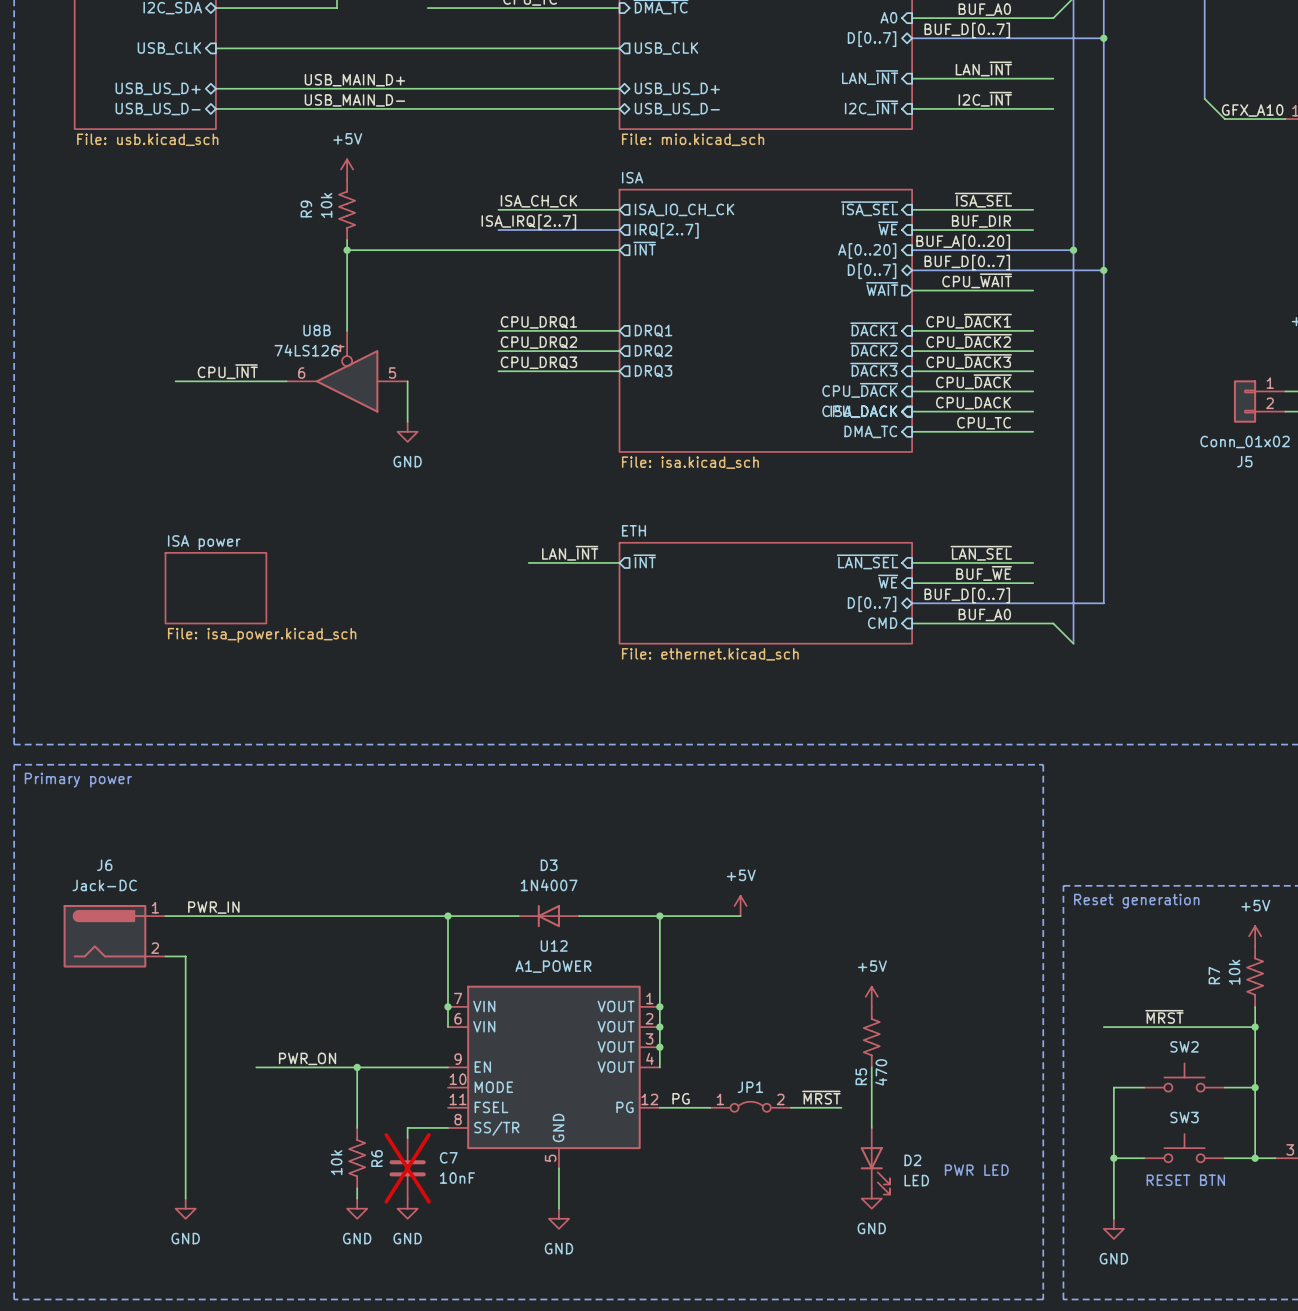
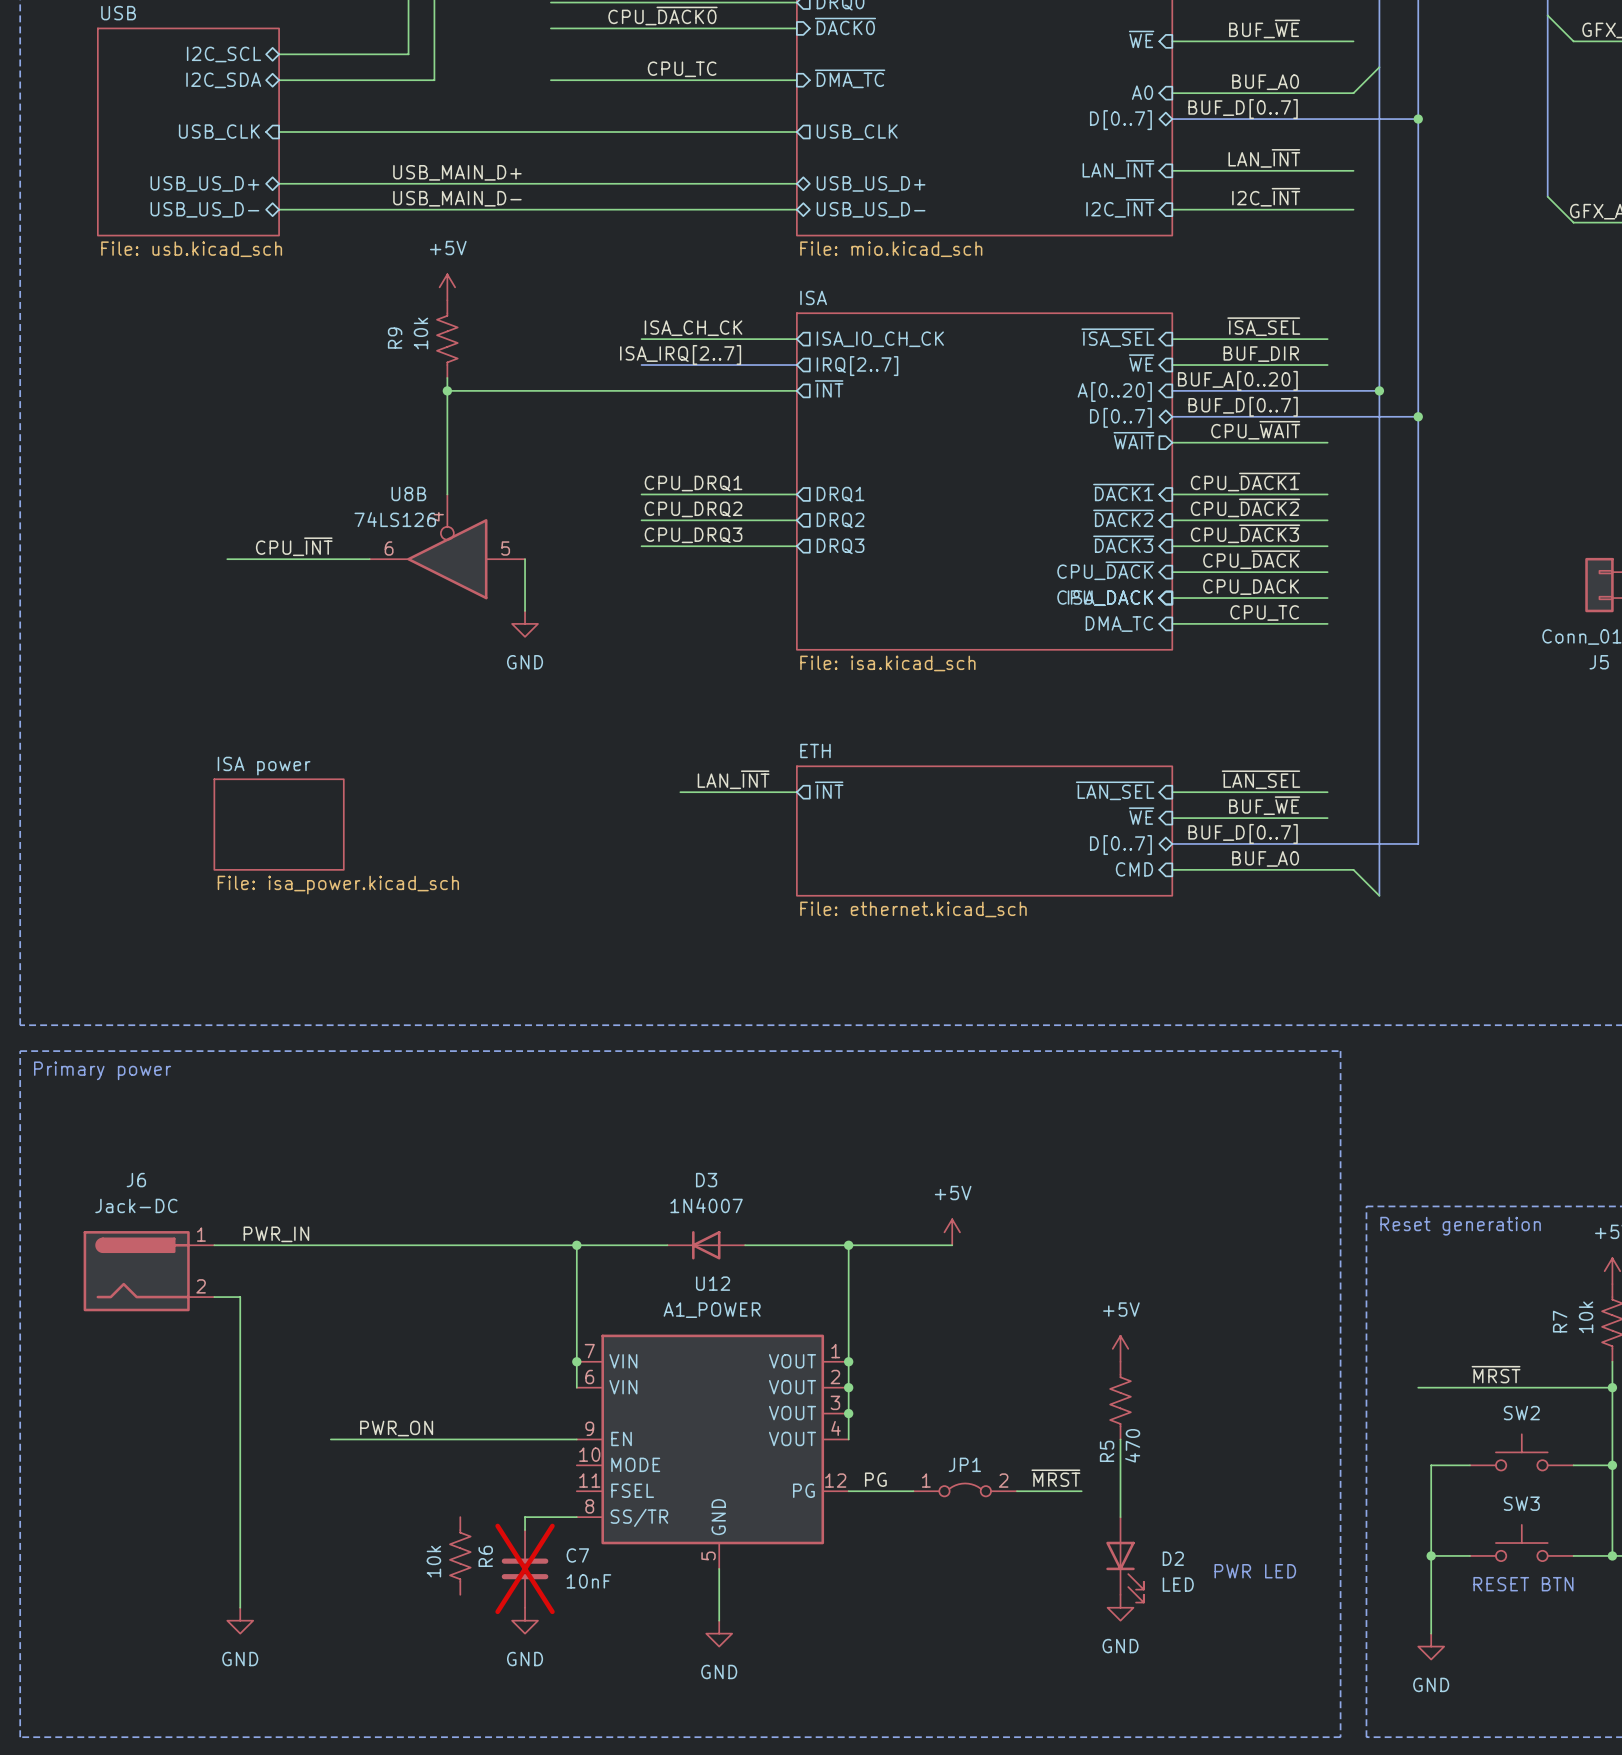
wire: (357, 1067) (357, 1127) -> none
junction: (357, 1067) -> none
wire: (357, 1188) (357, 1198) -> none
power symbol: GND (357, 1208) -> none

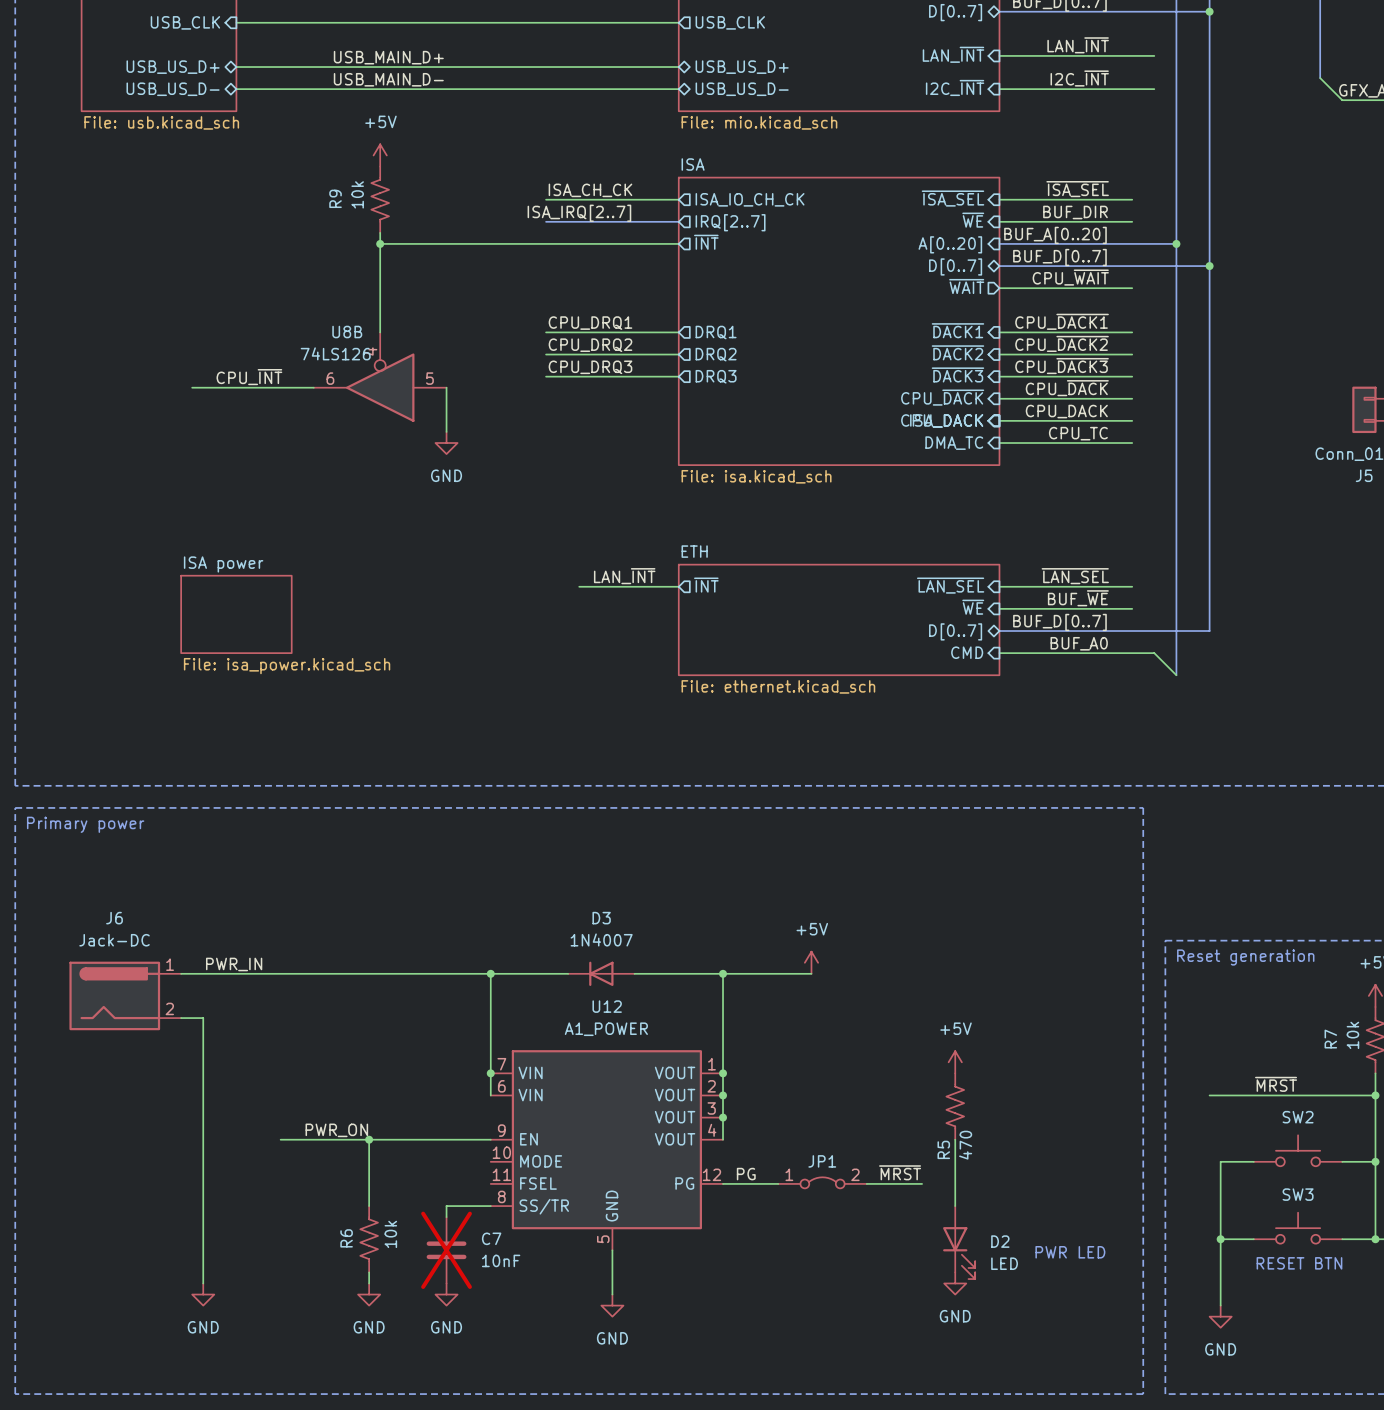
wire: none -> (369, 1139) (369, 1206)
junction: none -> (369, 1139)
R6 position: (460, 1555) -> (369, 1239)
R6 name position: R6 (485, 1556) -> R6 (346, 1238)
R6 value position: 10k (433, 1561) -> 10k (390, 1234)
wire: none -> (369, 1272) (369, 1283)
power symbol: none -> GND (369, 1294)

